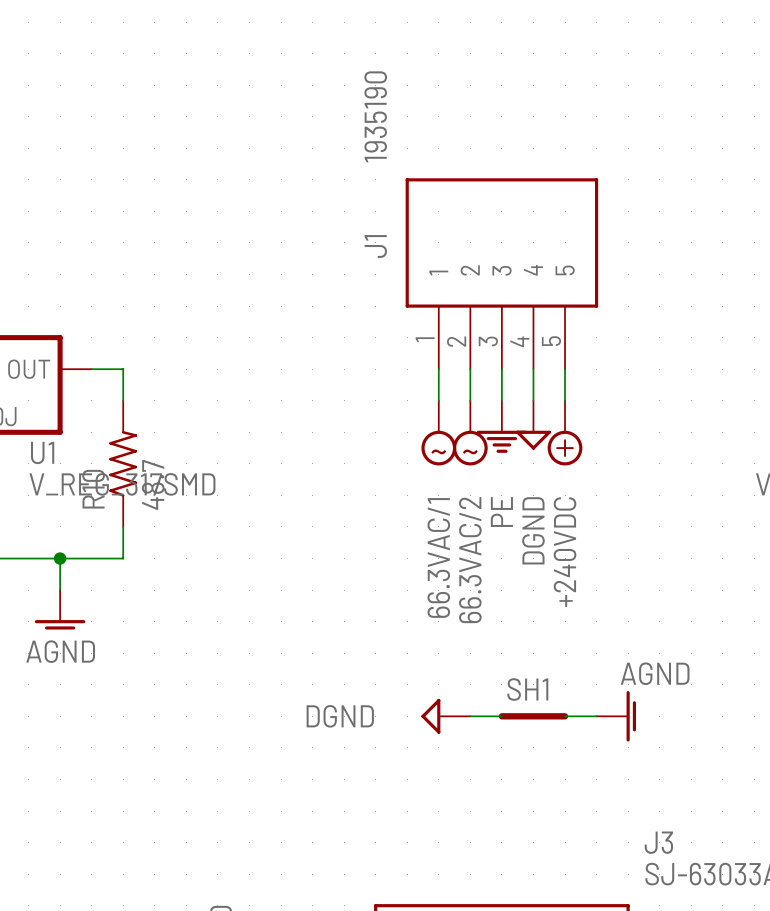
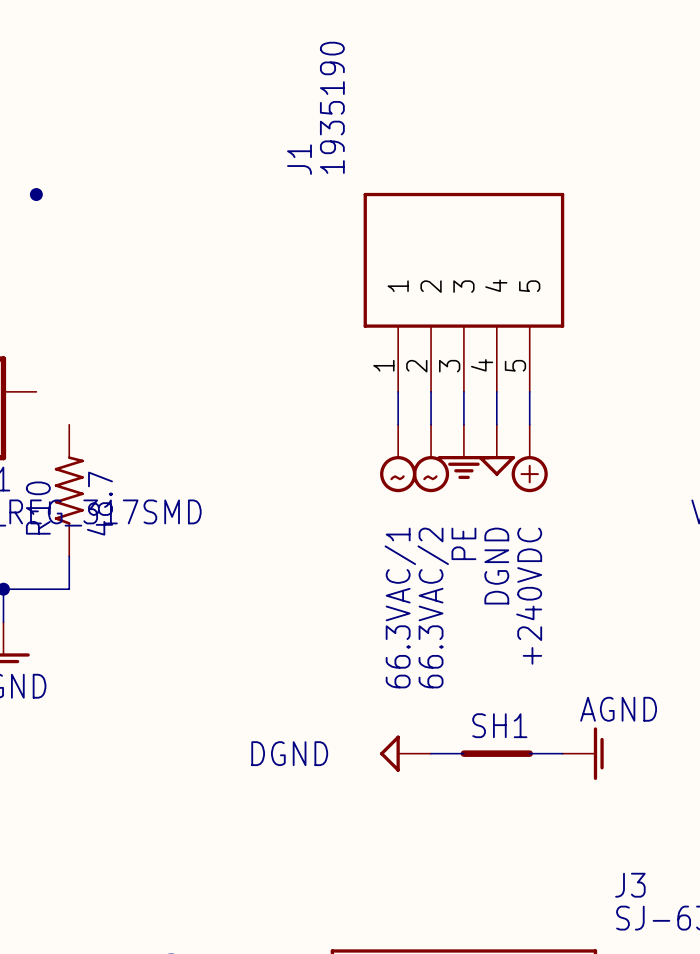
junction: none -> (36, 194)
J1 name position: J1 (375, 246) -> J1 (299, 159)
wire: (91, 369) (123, 369) (123, 400) -> none

